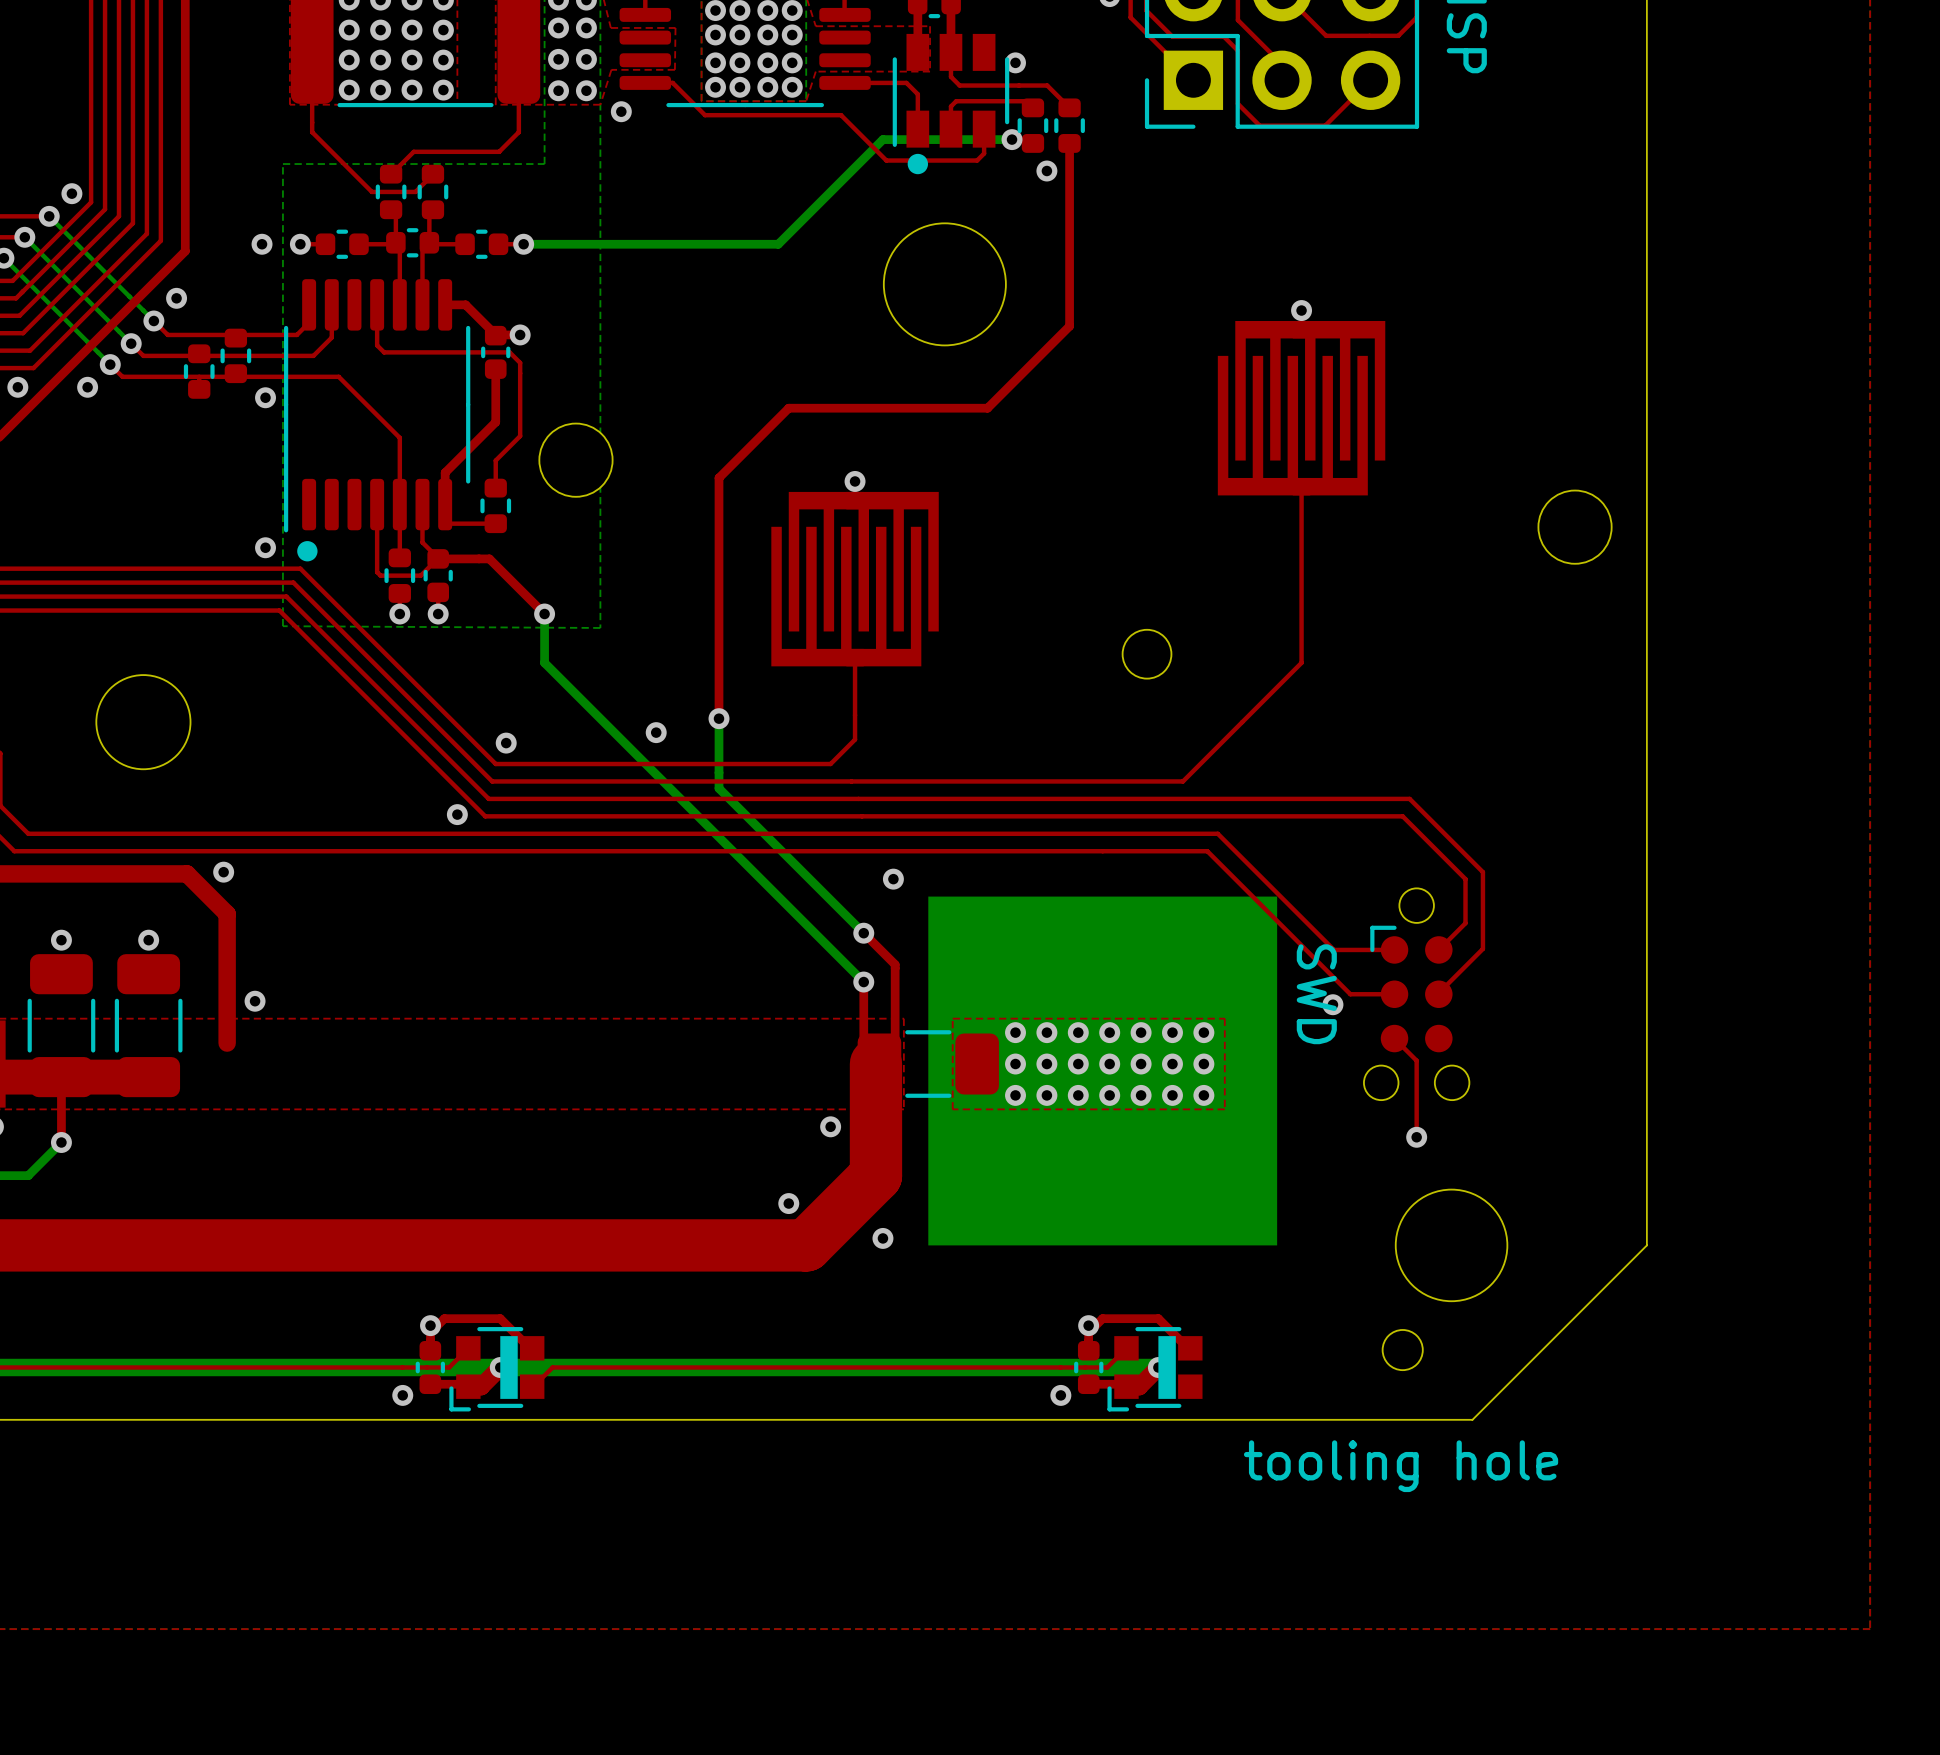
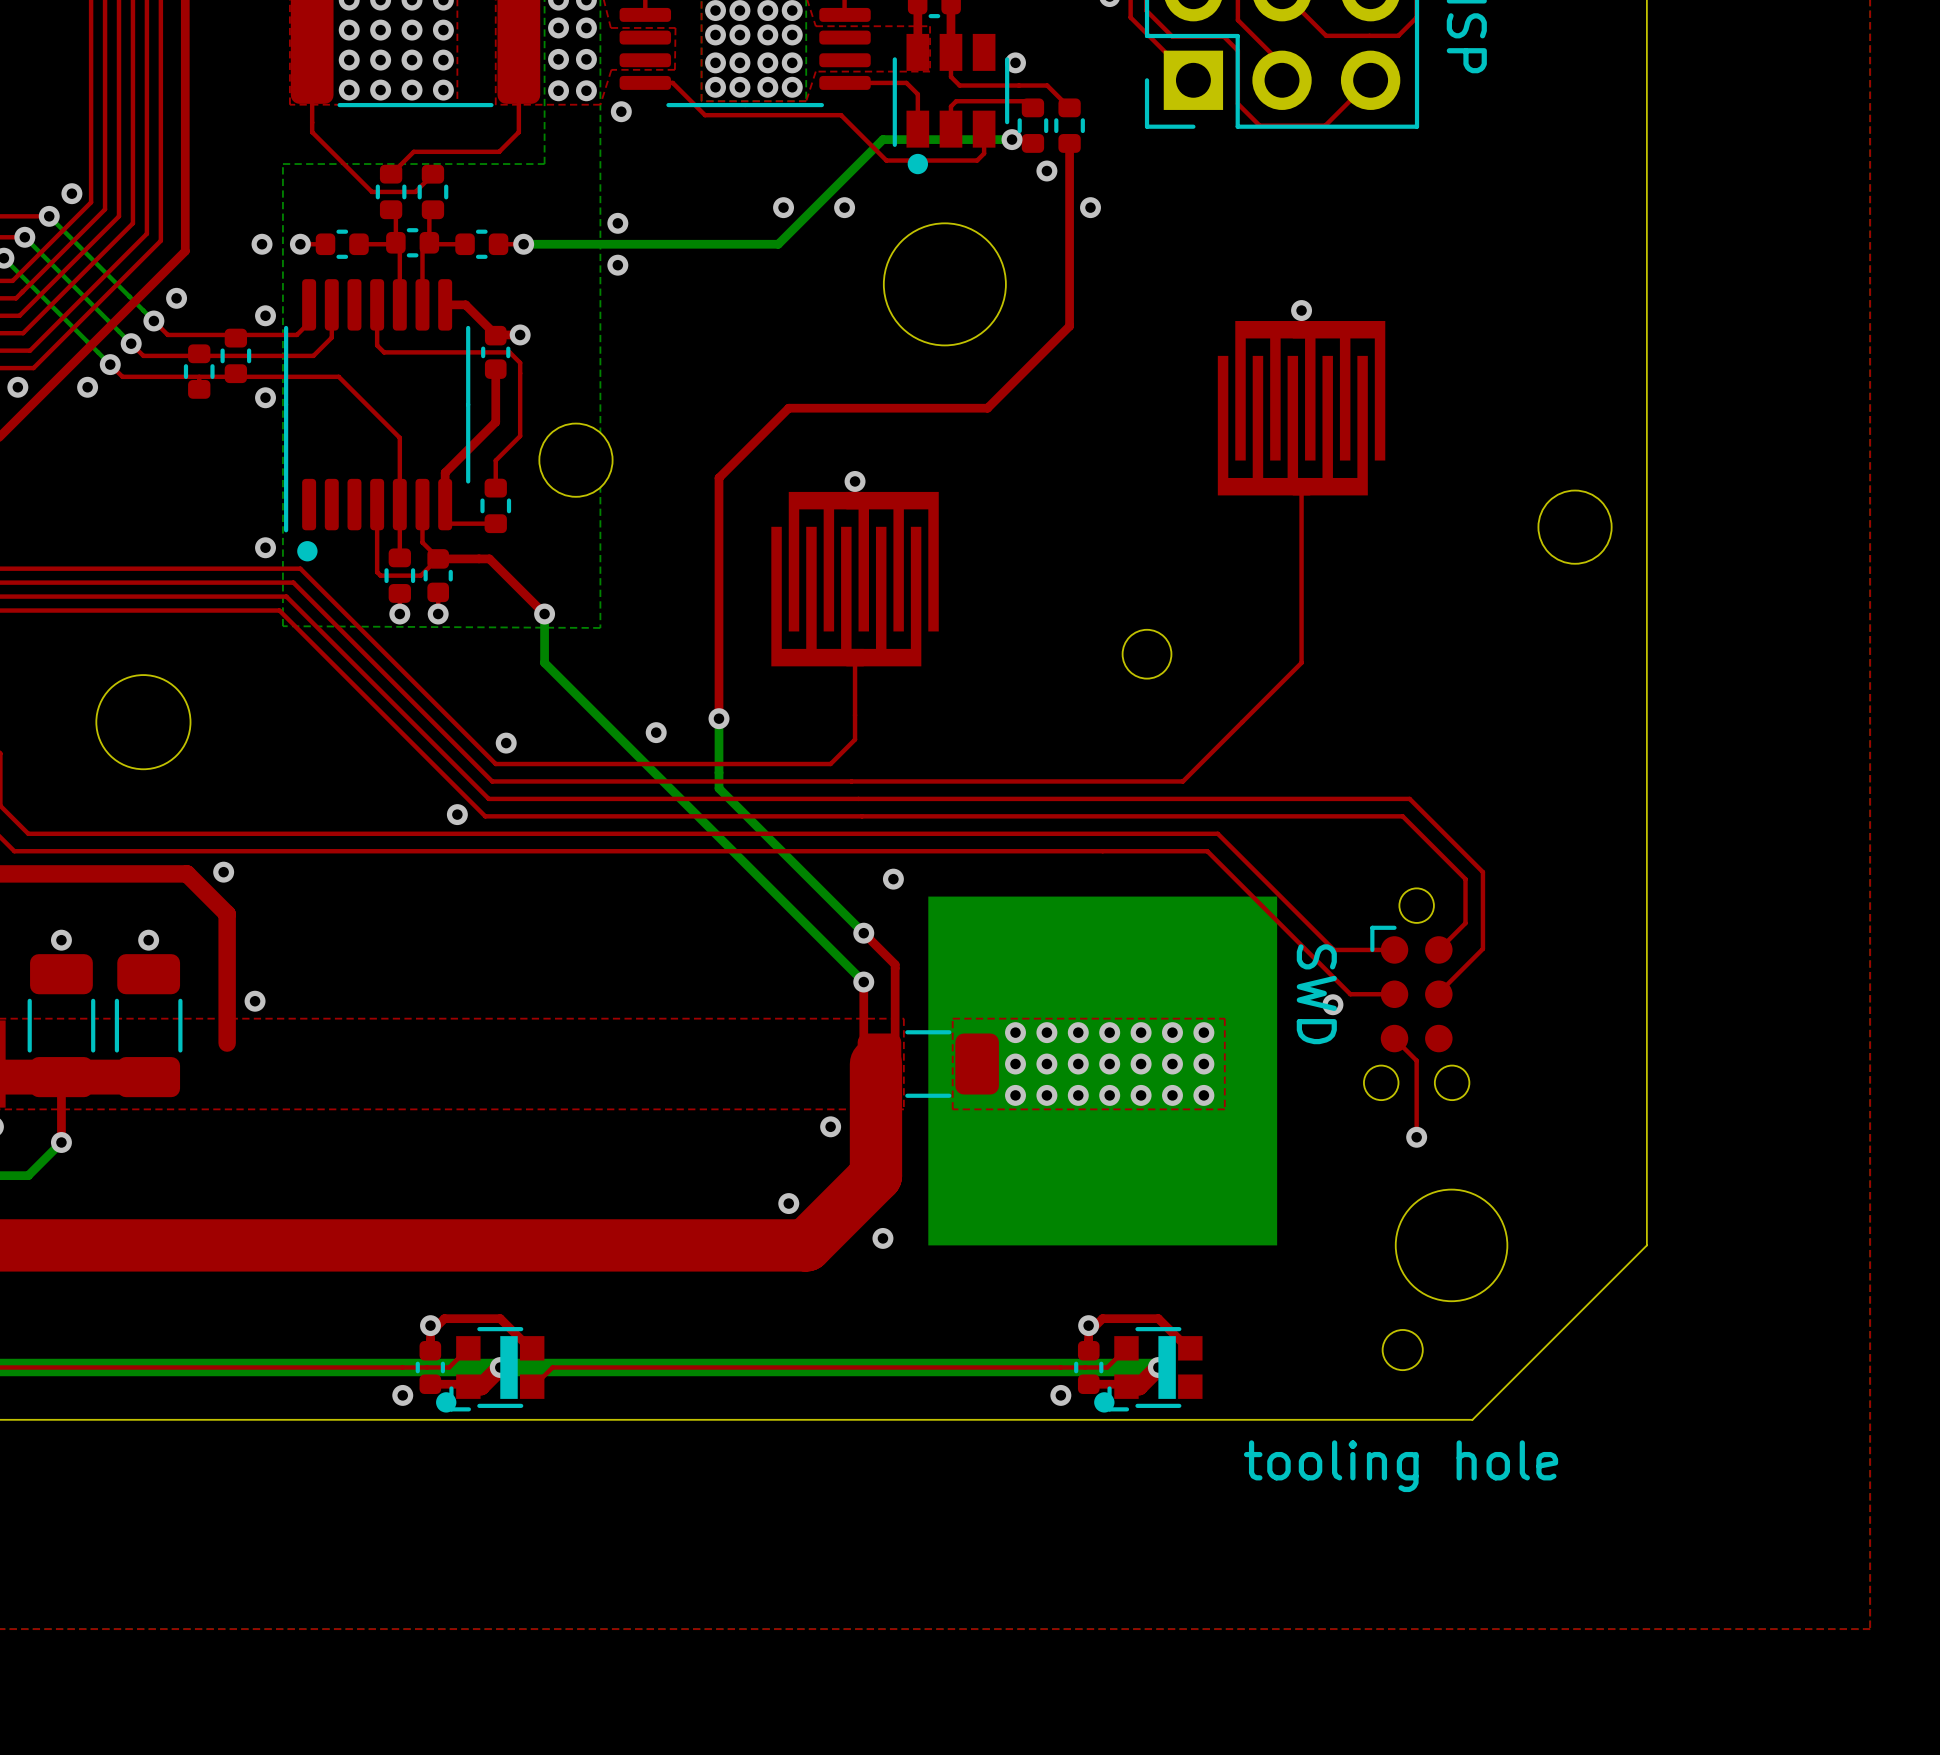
via: none -> (783, 207)
via: none -> (844, 207)
via: none -> (1090, 207)
via: none -> (617, 223)
via: none -> (617, 265)
via: none -> (265, 315)
drawing: none -> [436, 1392, 457, 1413]
drawing: none -> [1094, 1392, 1115, 1413]

